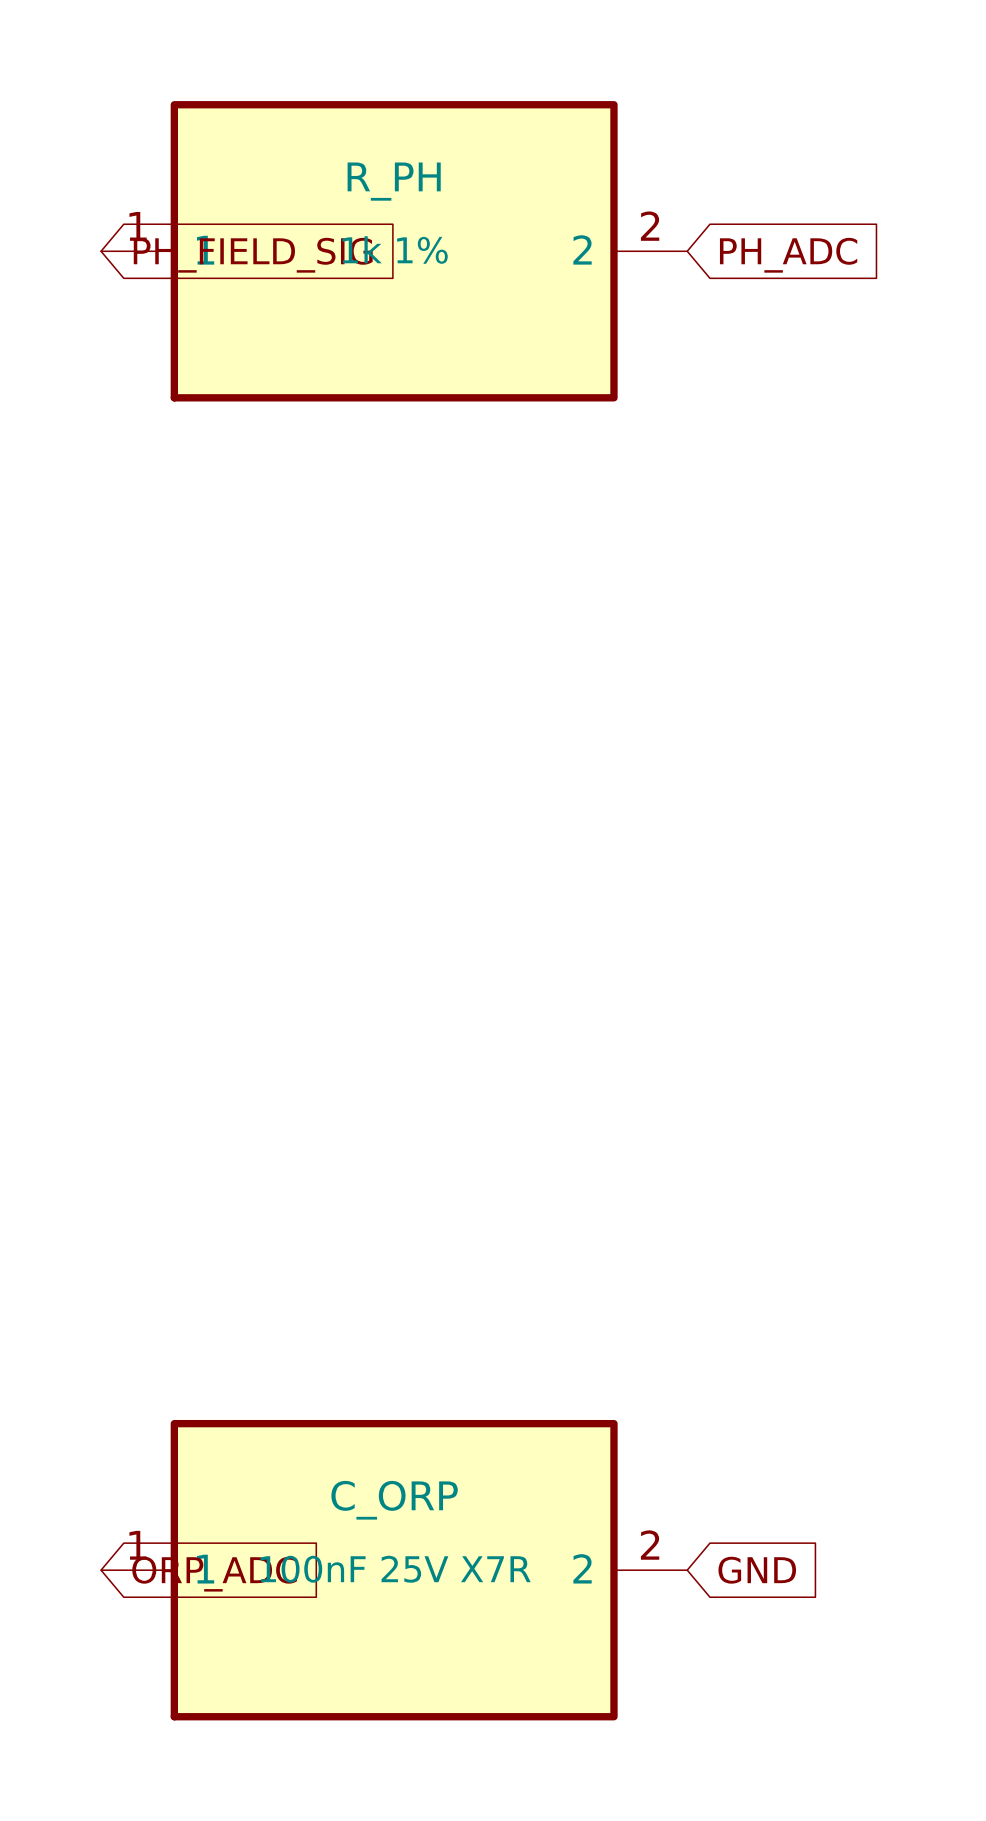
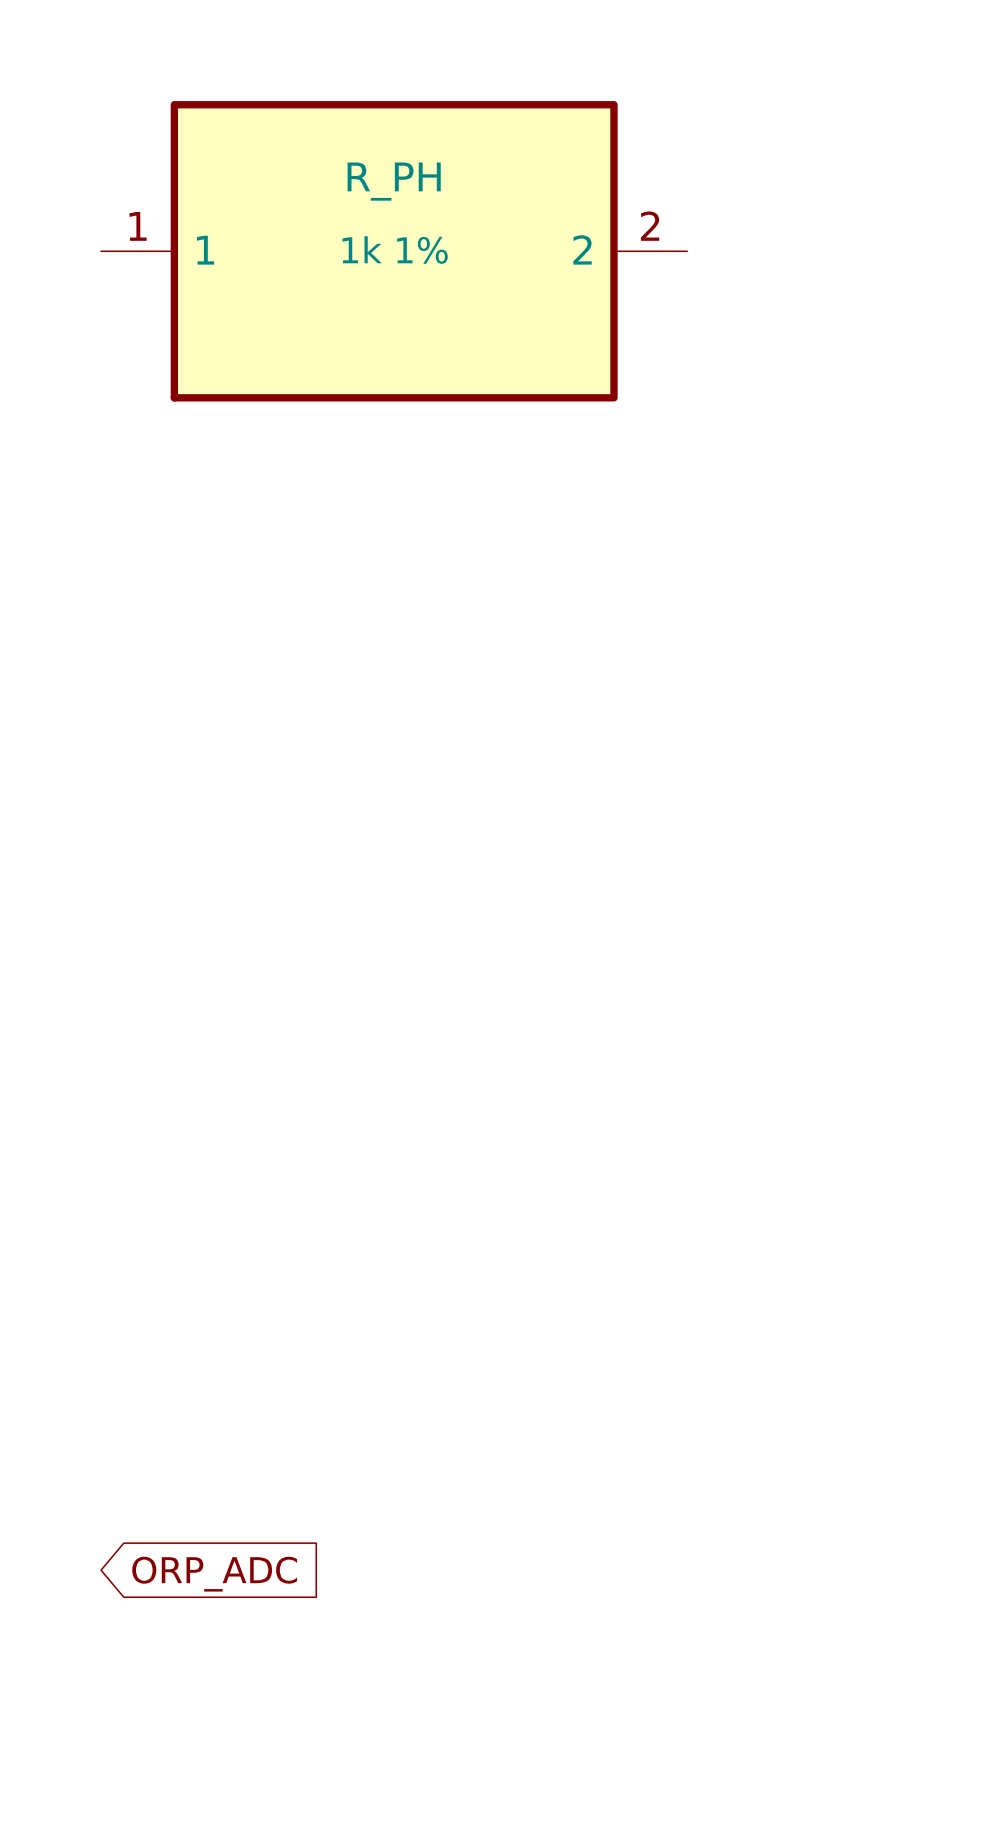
global label: PH_FIELD_SIG (253, 255) -> none
global label: PH_ADC (788, 255) -> none
C_ORP: 100nF 25V X7R (394, 1570) -> none
global label: GND (757, 1570) -> none

